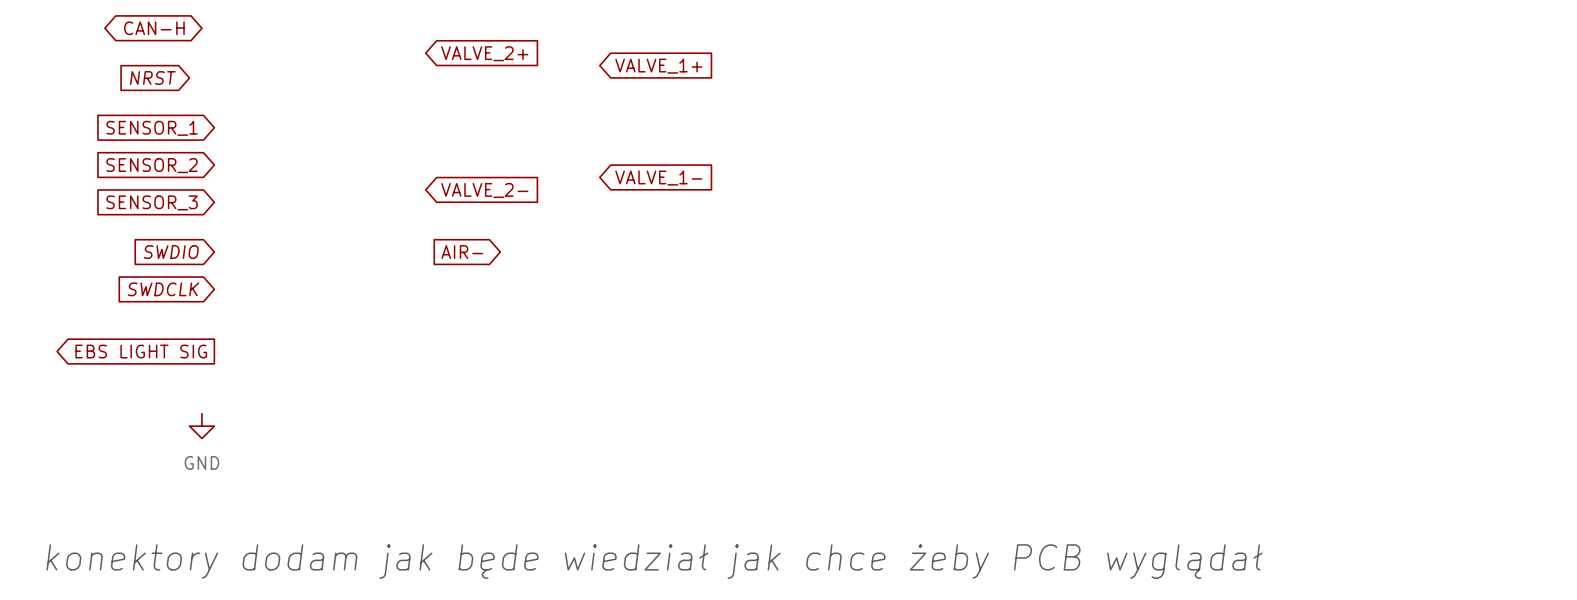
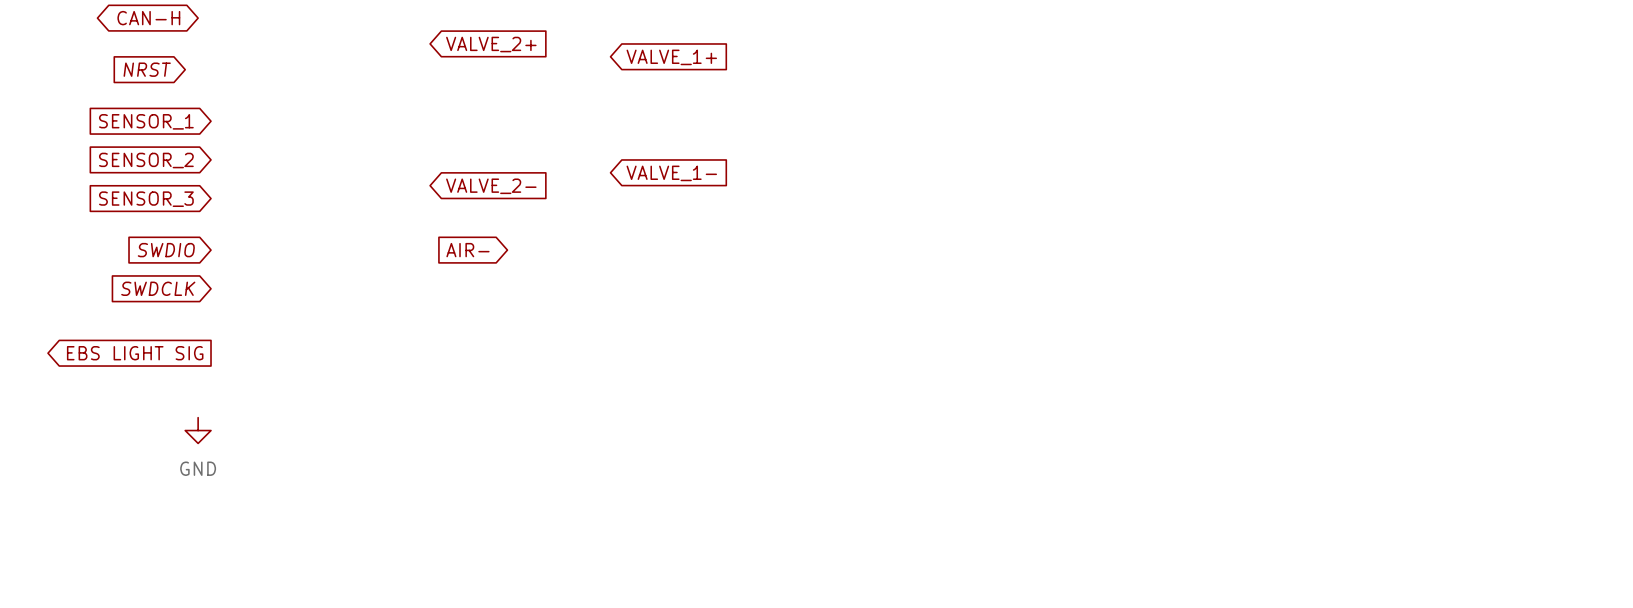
text: konektory dodam jak będe wiedział jak chce żeby PCB wyglądał (654, 561) -> none

